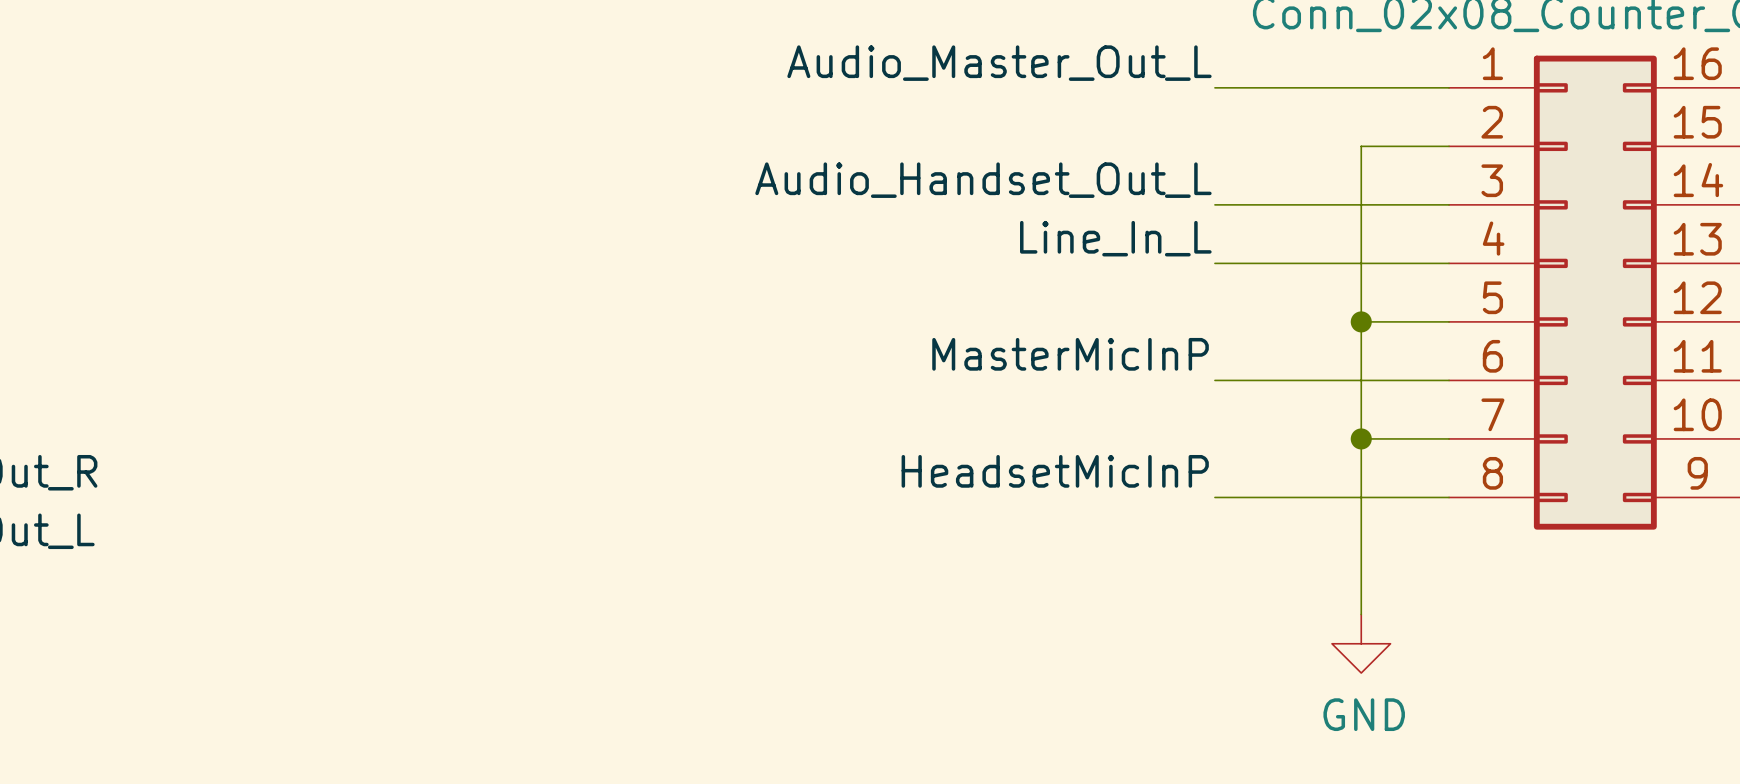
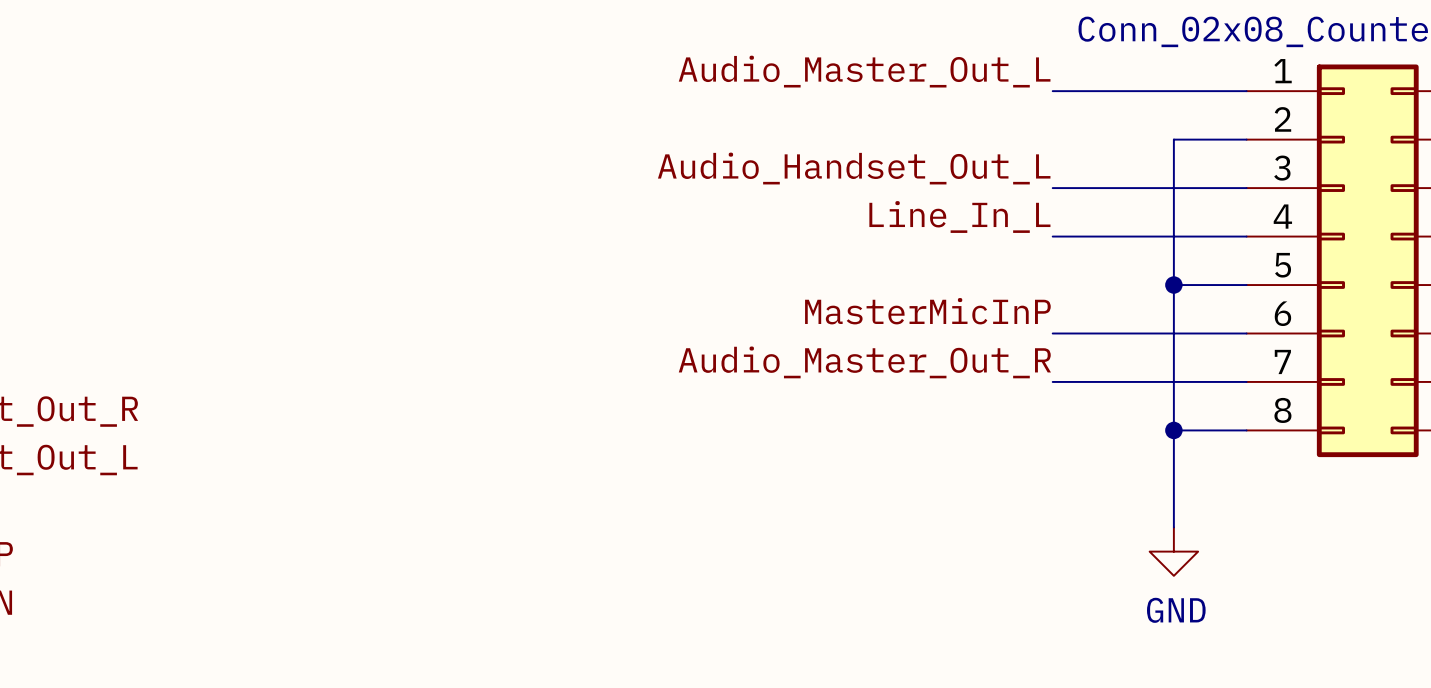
label: none -> Audio_Master_Out_R (864, 362)
junction position: (1361, 438) -> (1173, 430)
label: HeadsetMicInP (1055, 471) -> none
wire: (1214, 497) (1361, 497) -> (1052, 381) (1173, 381)

